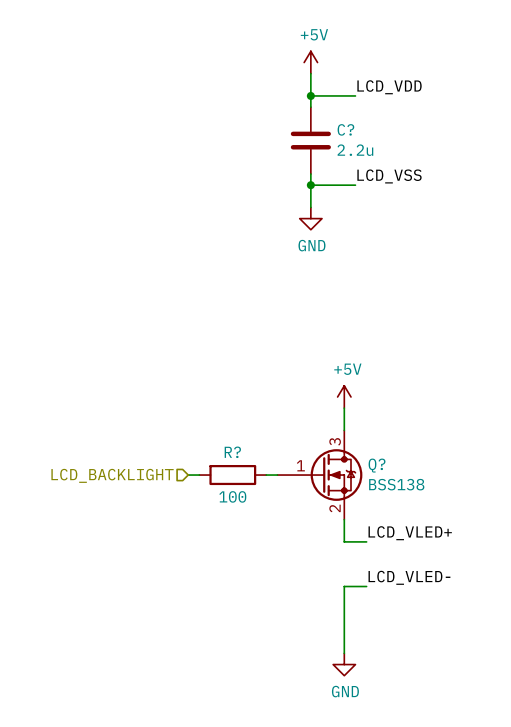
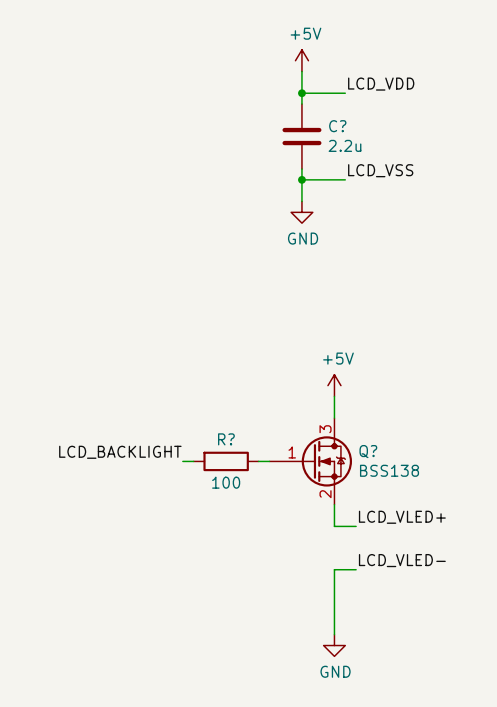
label: none -> LCD_BACKLIGHT (120, 452)
hierarchical label: LCD_BACKLIGHT (112, 475) -> none

